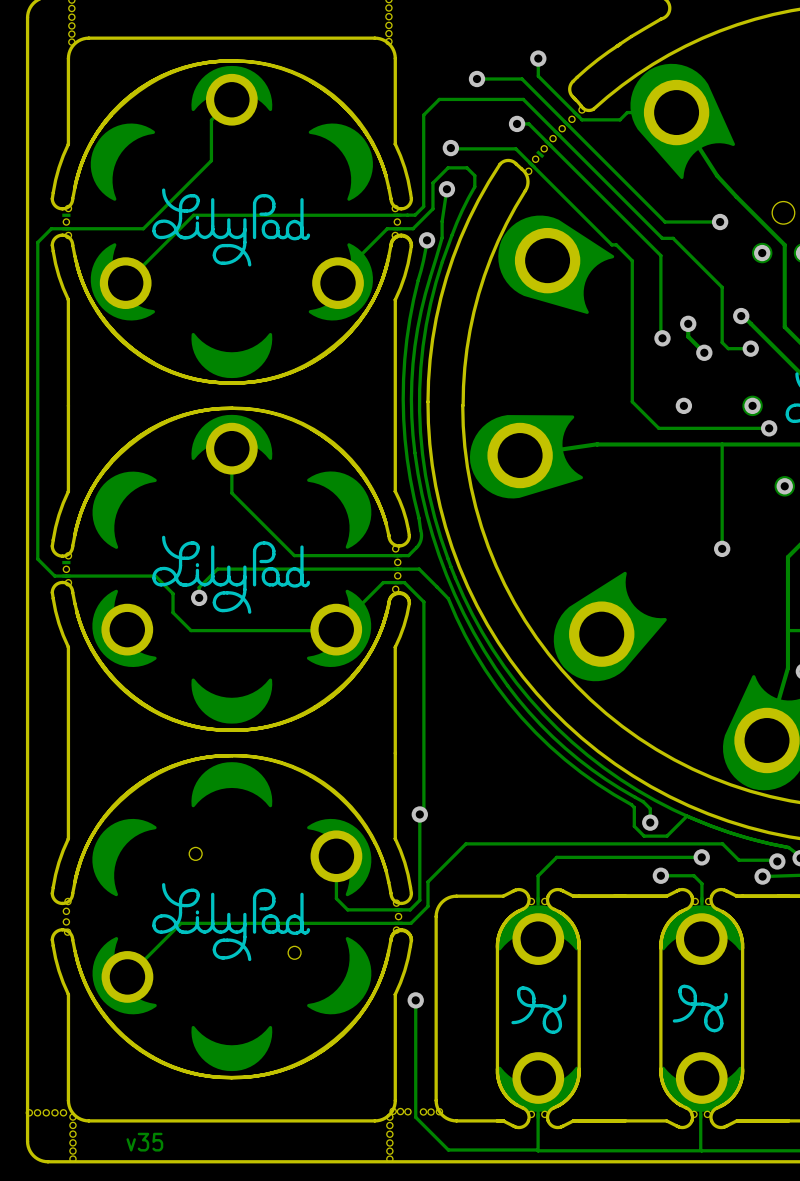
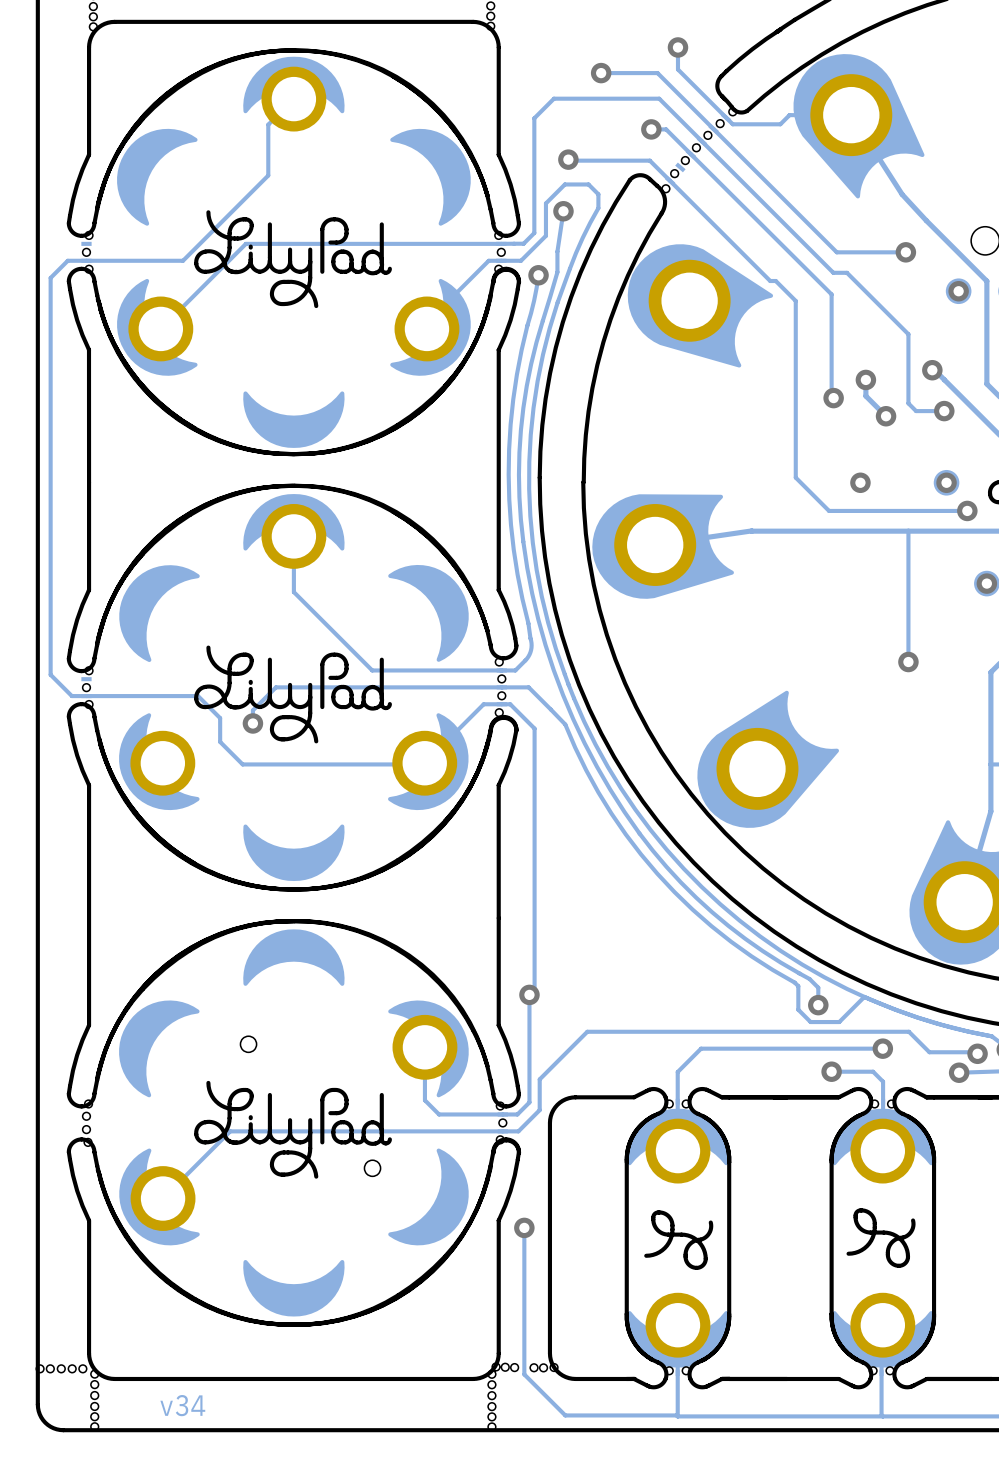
text: v35 (144, 1142) -> v34 (182, 1405)

